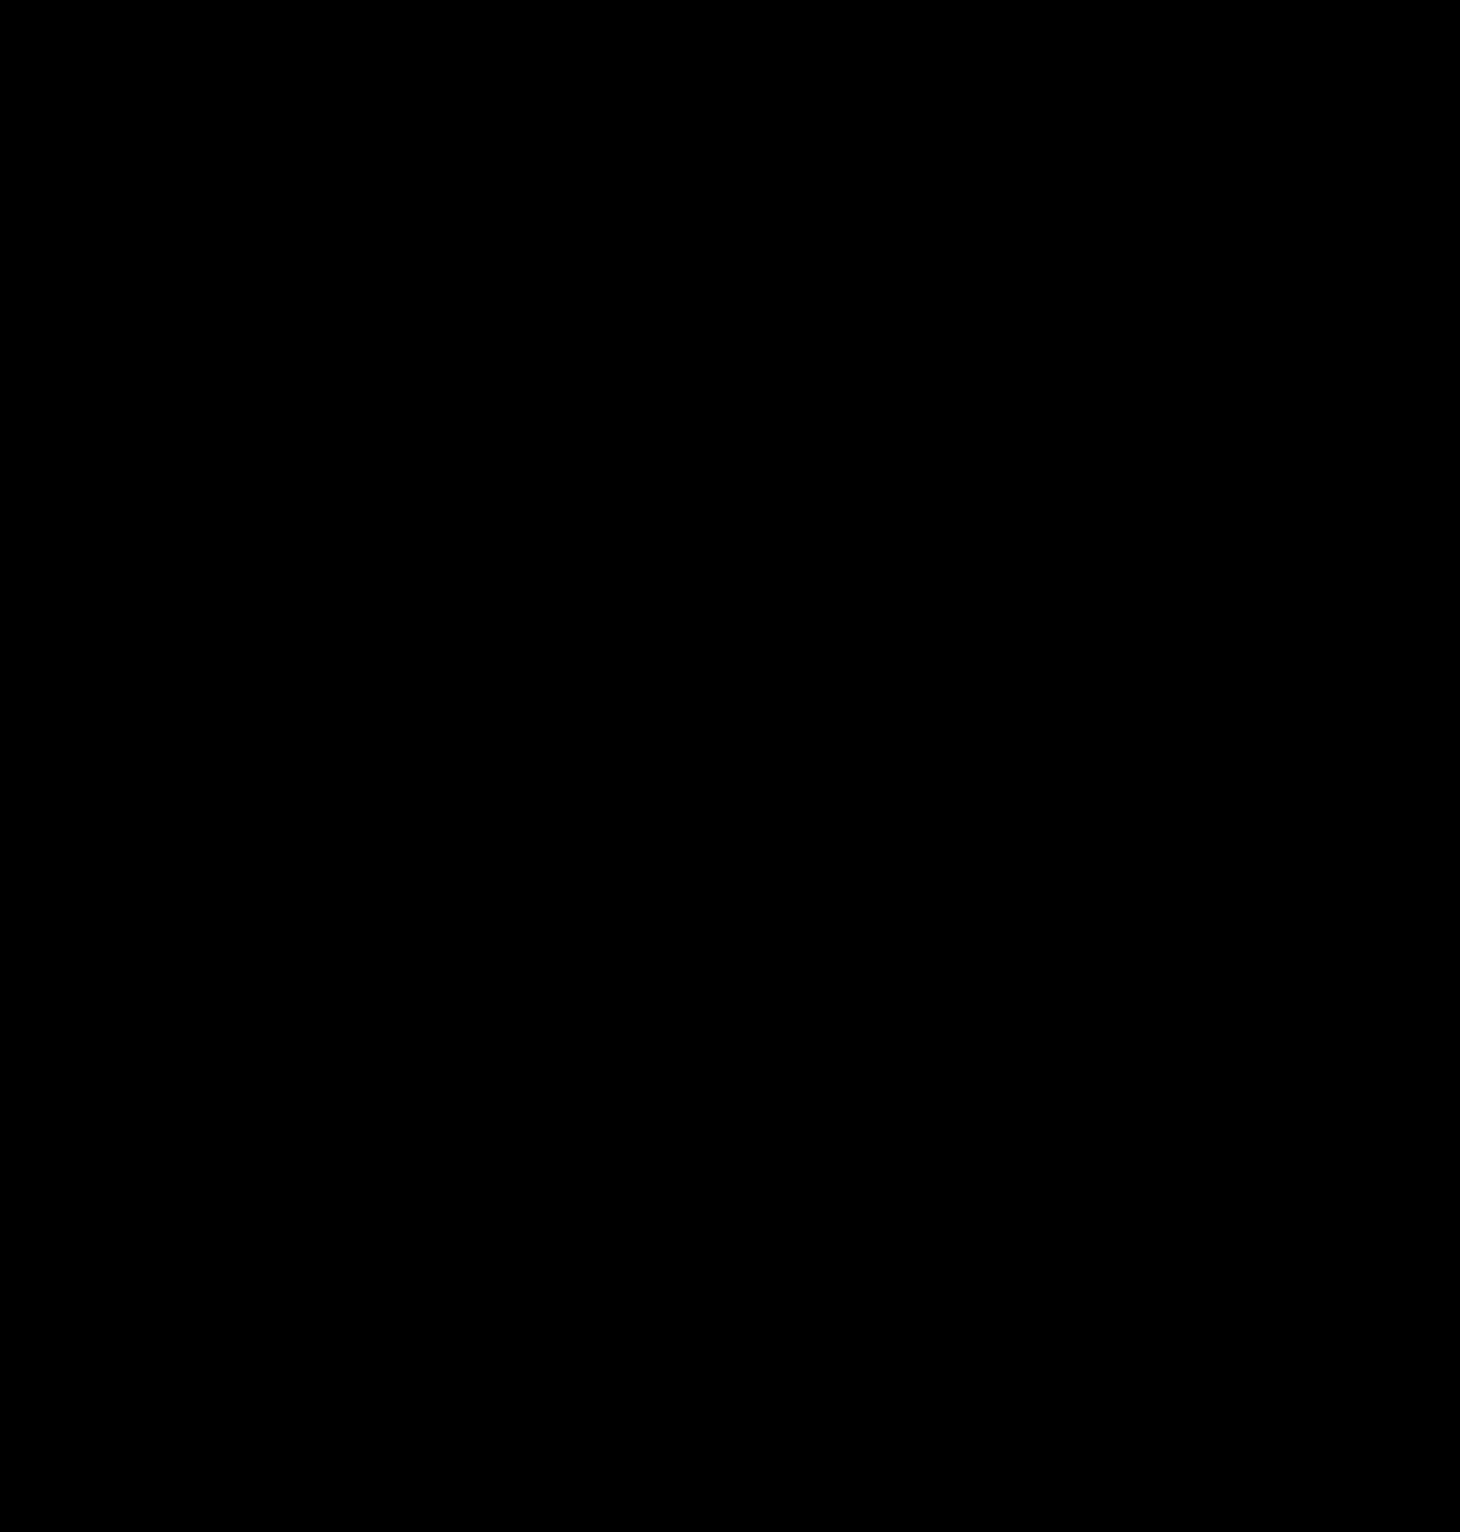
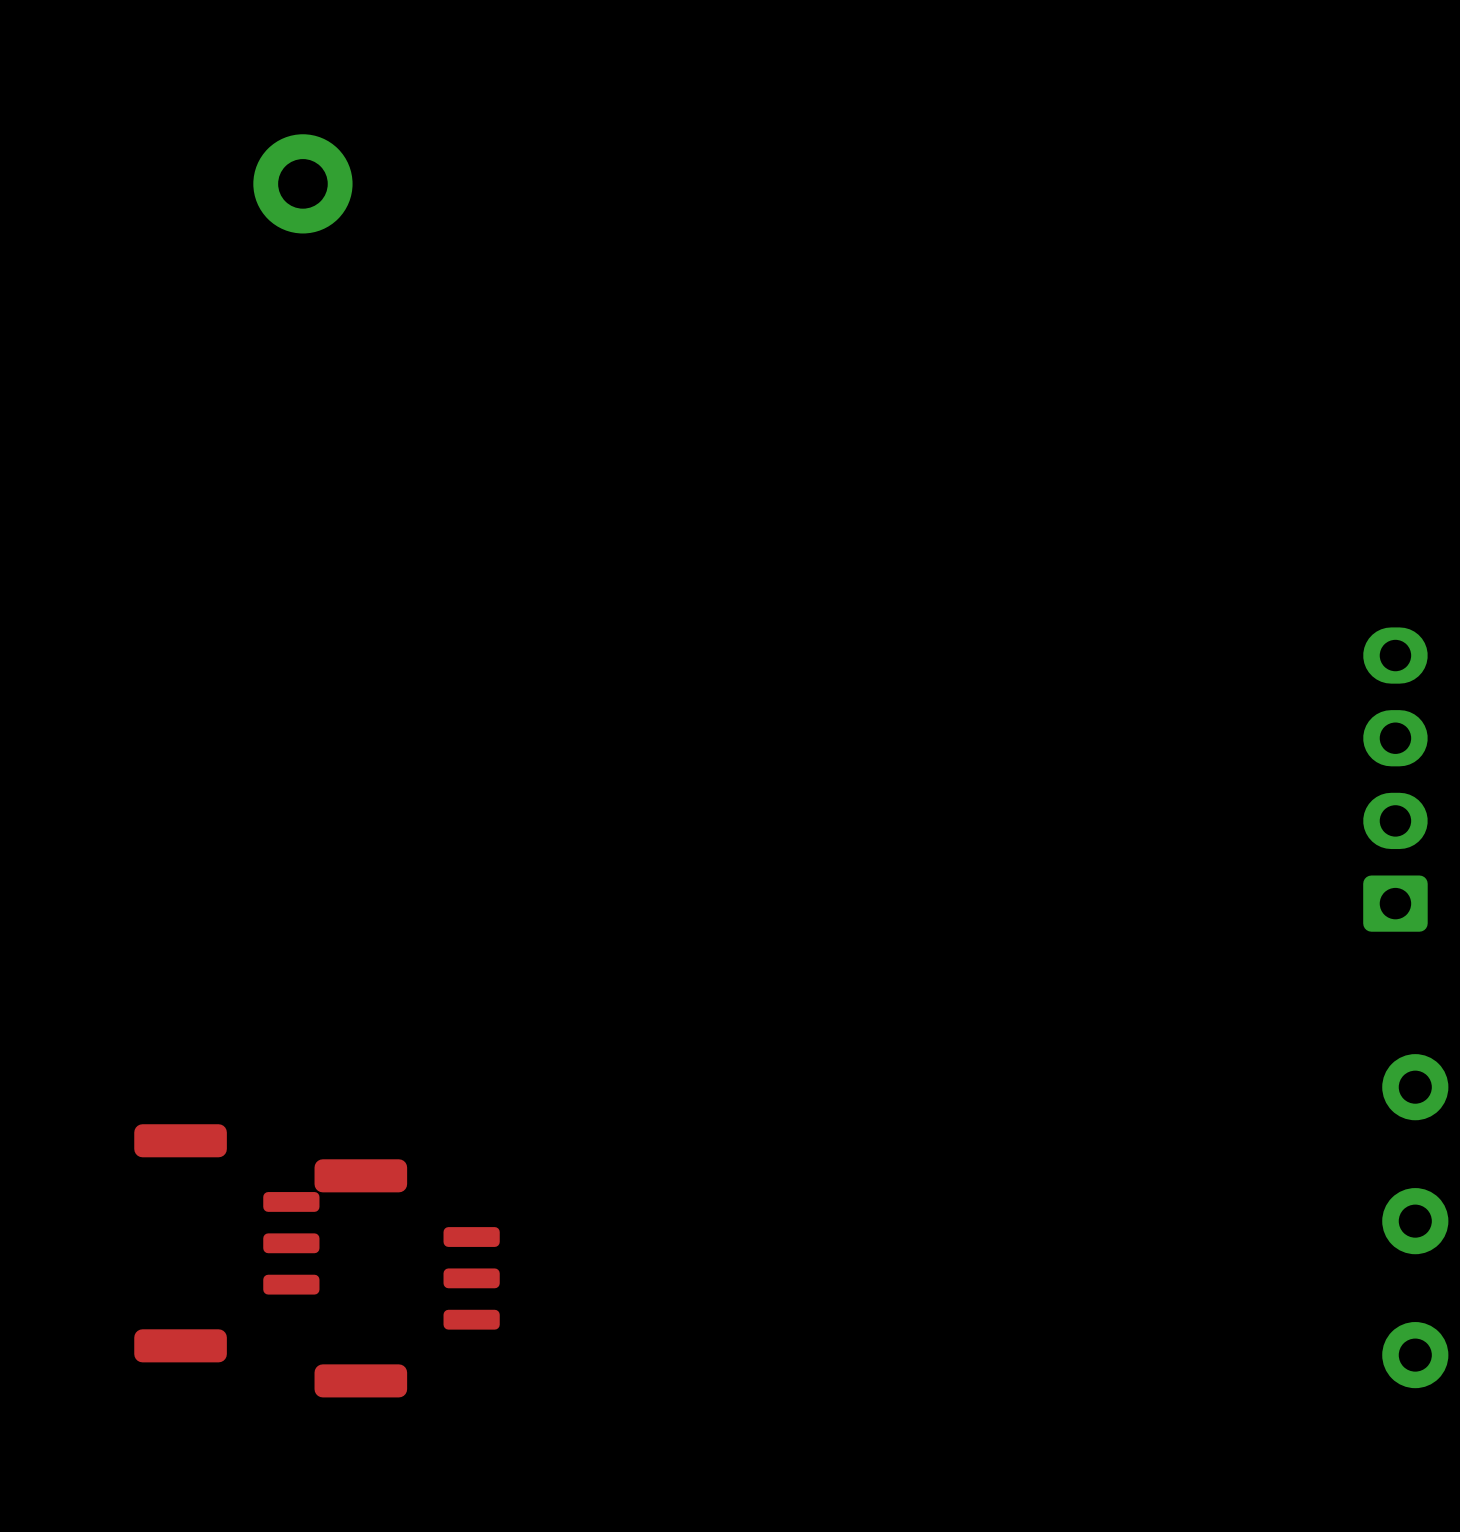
part: none -> (302, 183)
part: none -> (1395, 779)
part: none -> (1415, 1087)
part: none -> (1415, 1221)
part: none -> (226, 1243)
part: none -> (407, 1278)
part: none -> (1415, 1355)

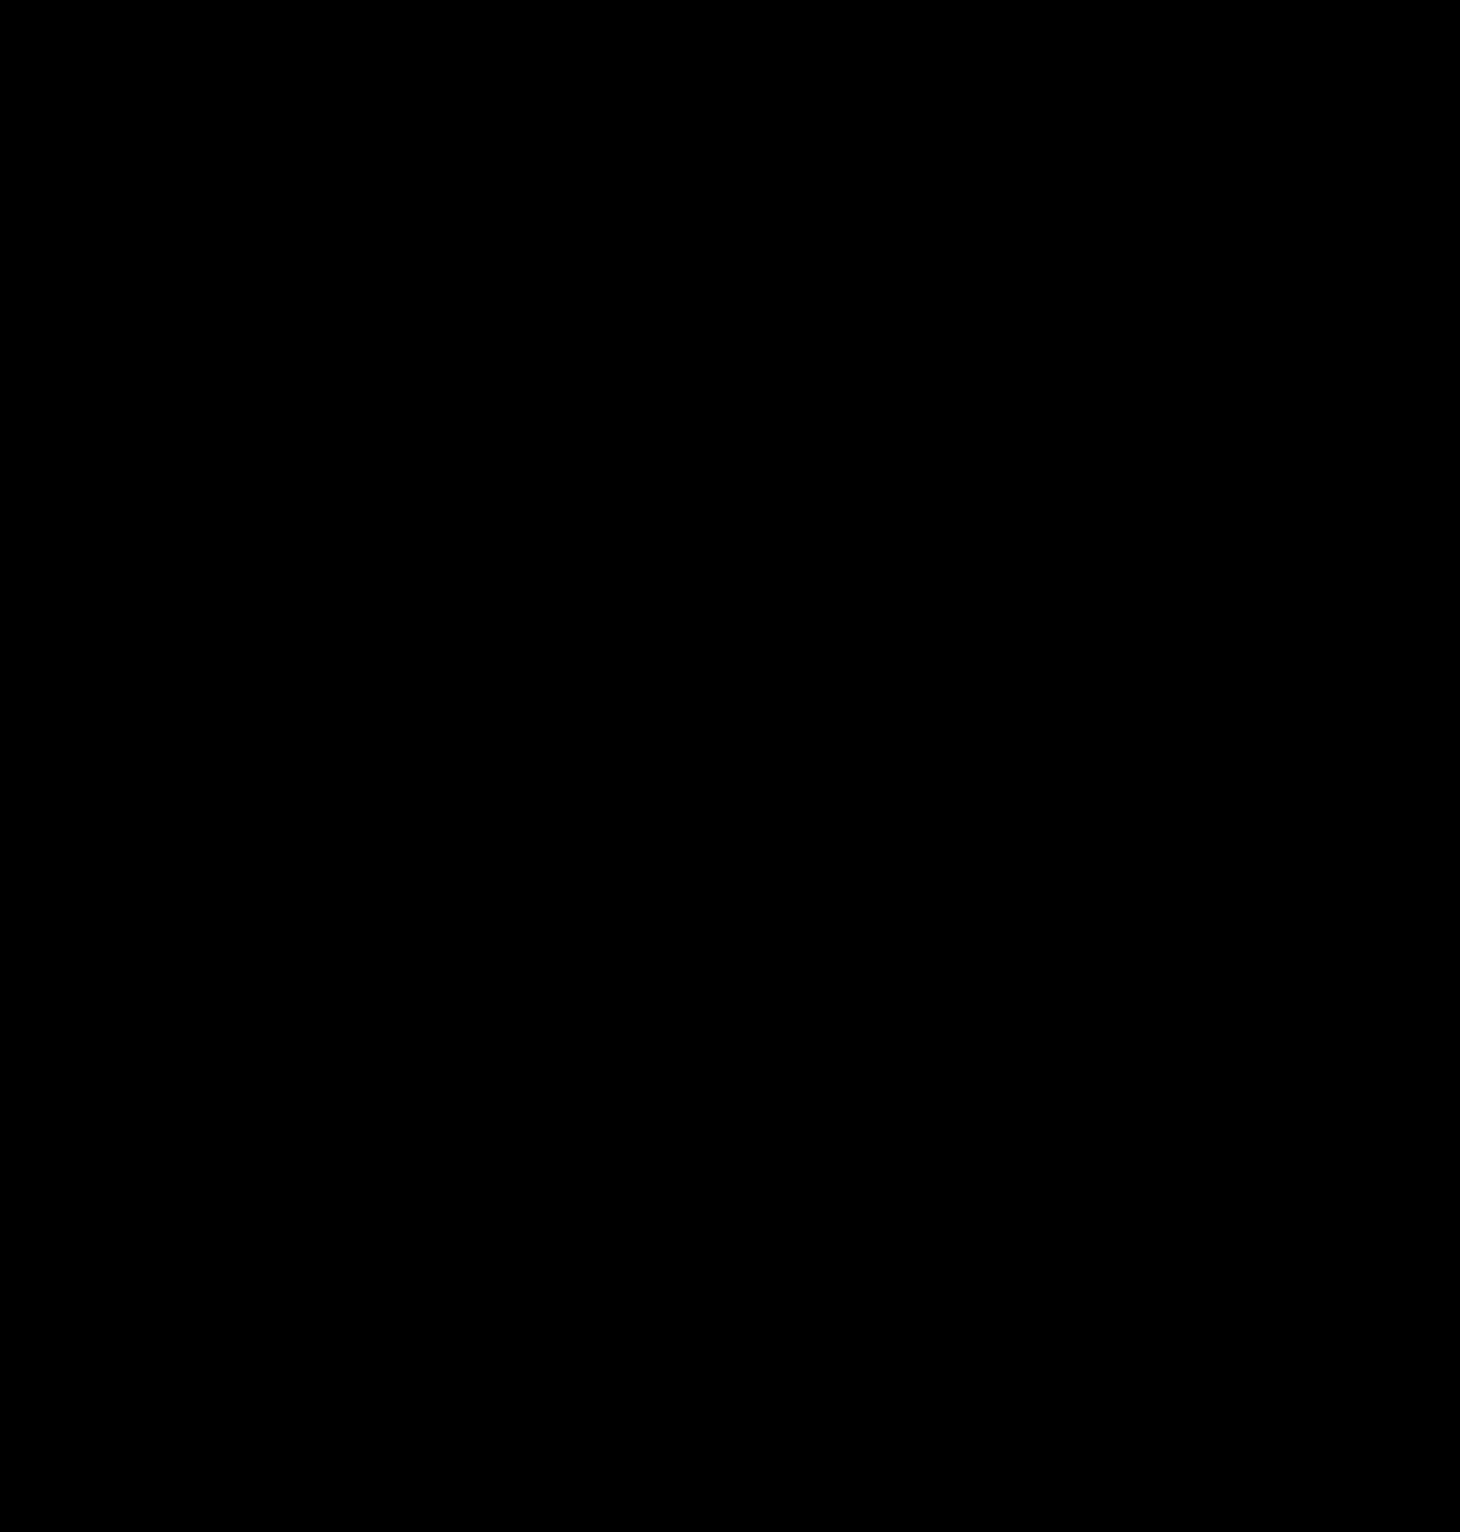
part: (302, 183) -> none
part: (1395, 779) -> none
part: (1415, 1087) -> none
part: (1415, 1221) -> none
part: (226, 1243) -> none
part: (407, 1278) -> none
part: (1415, 1355) -> none

